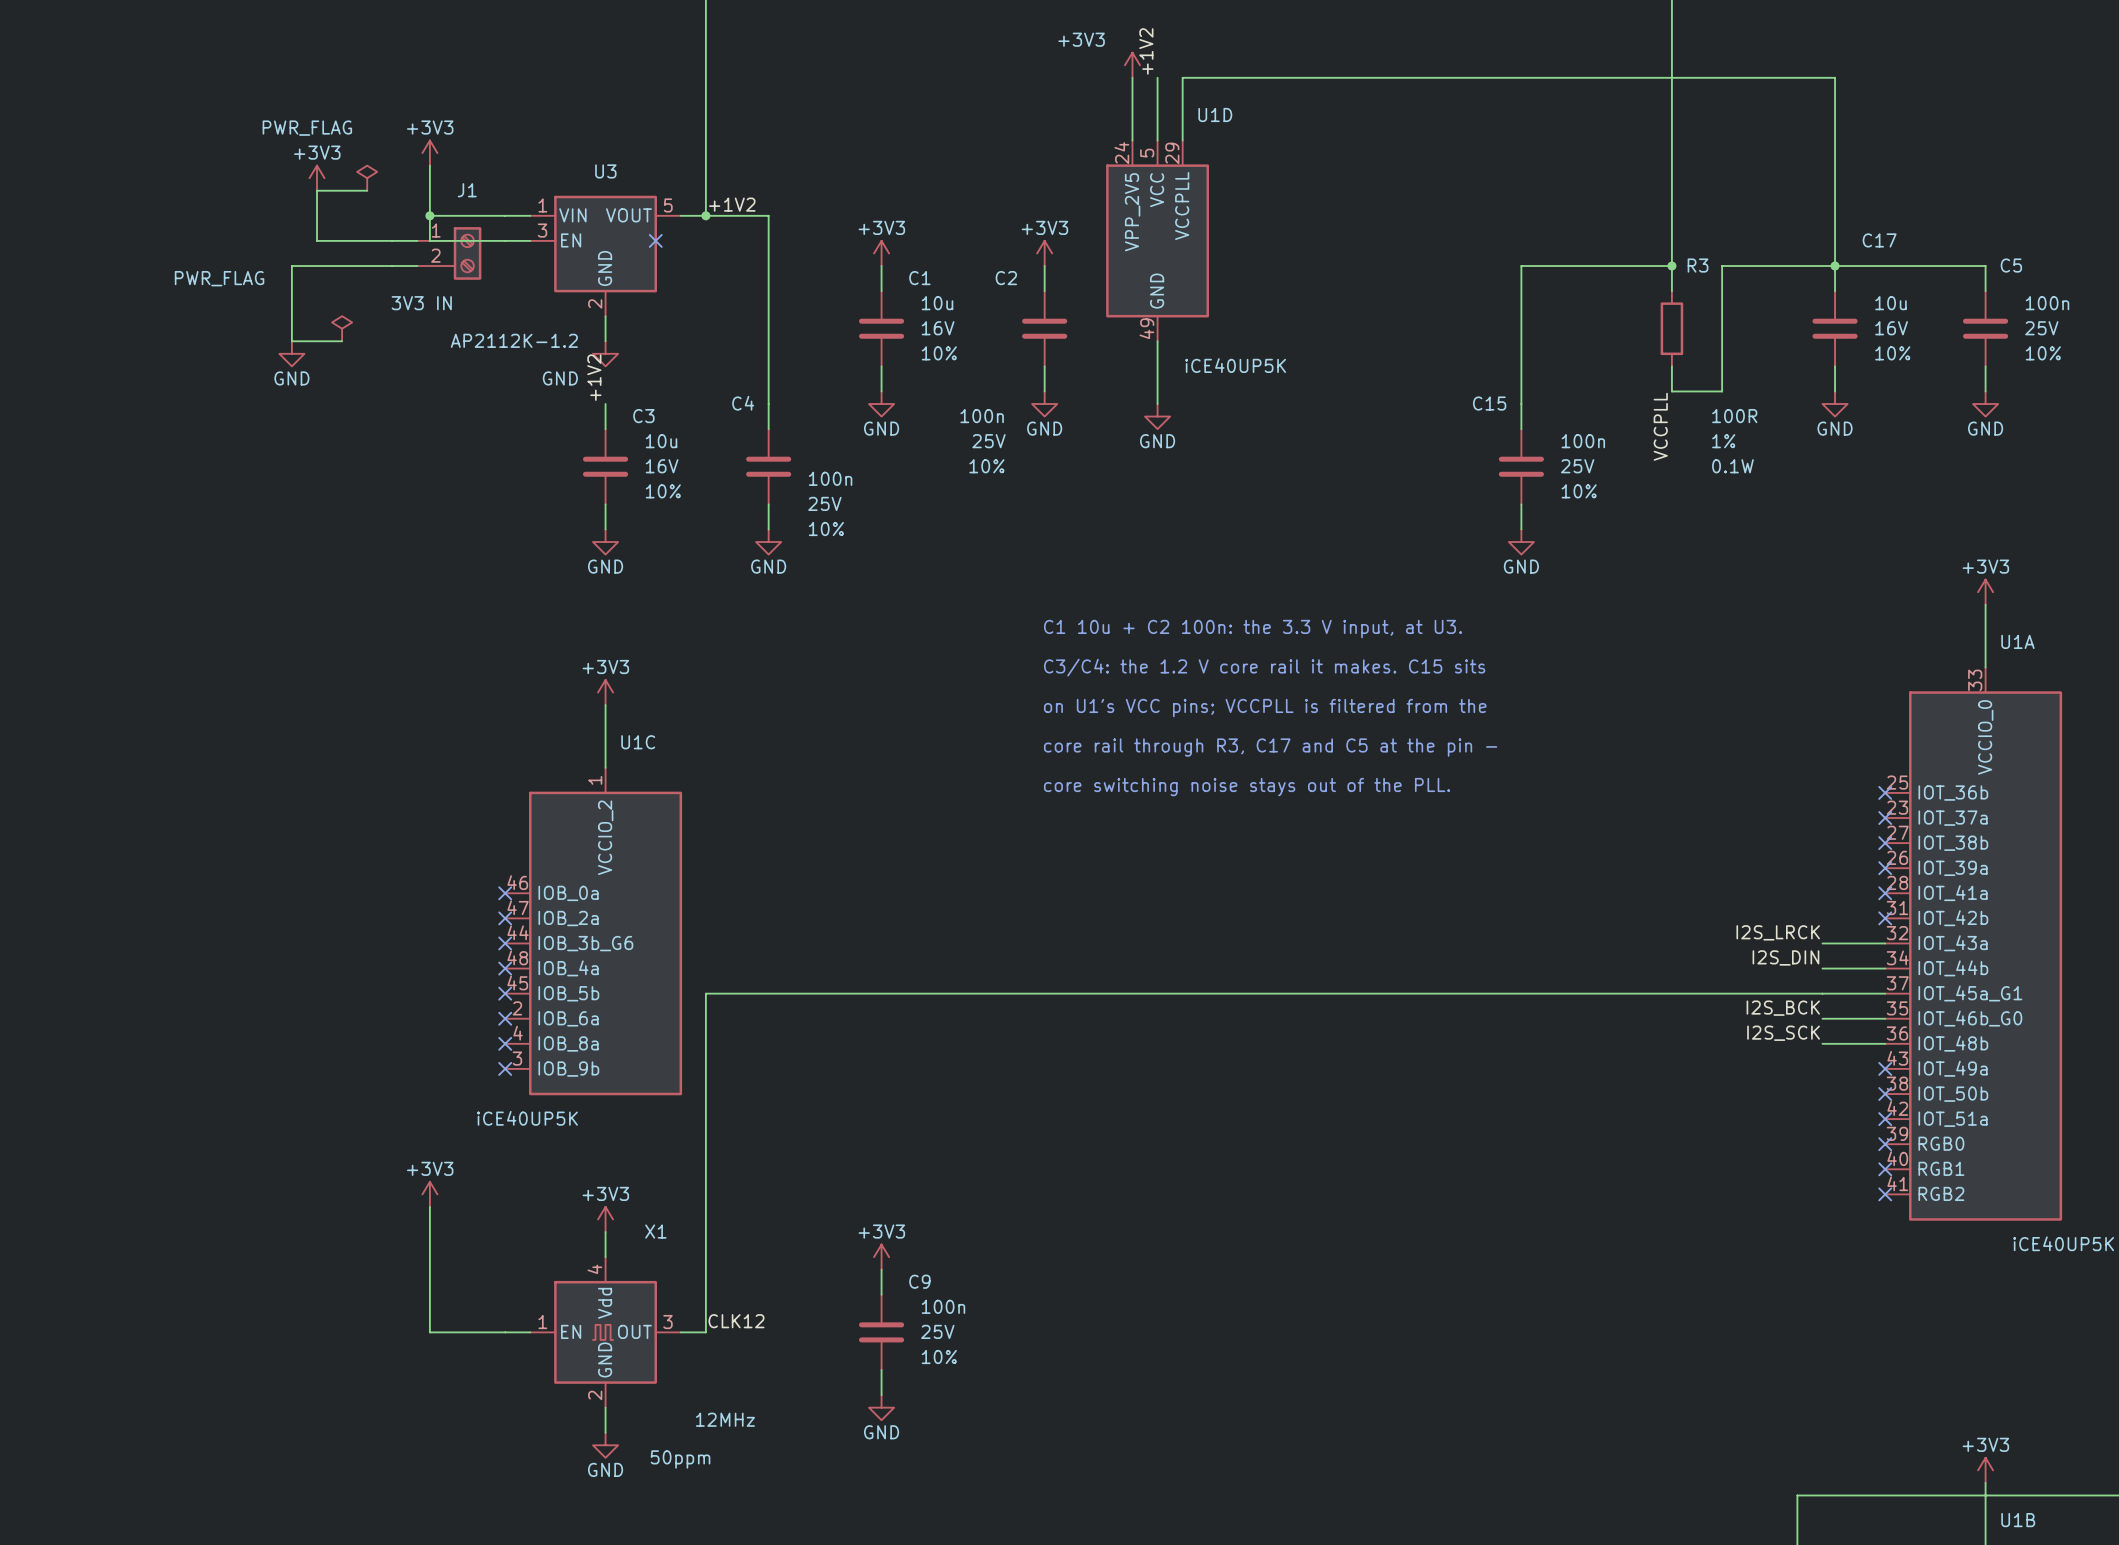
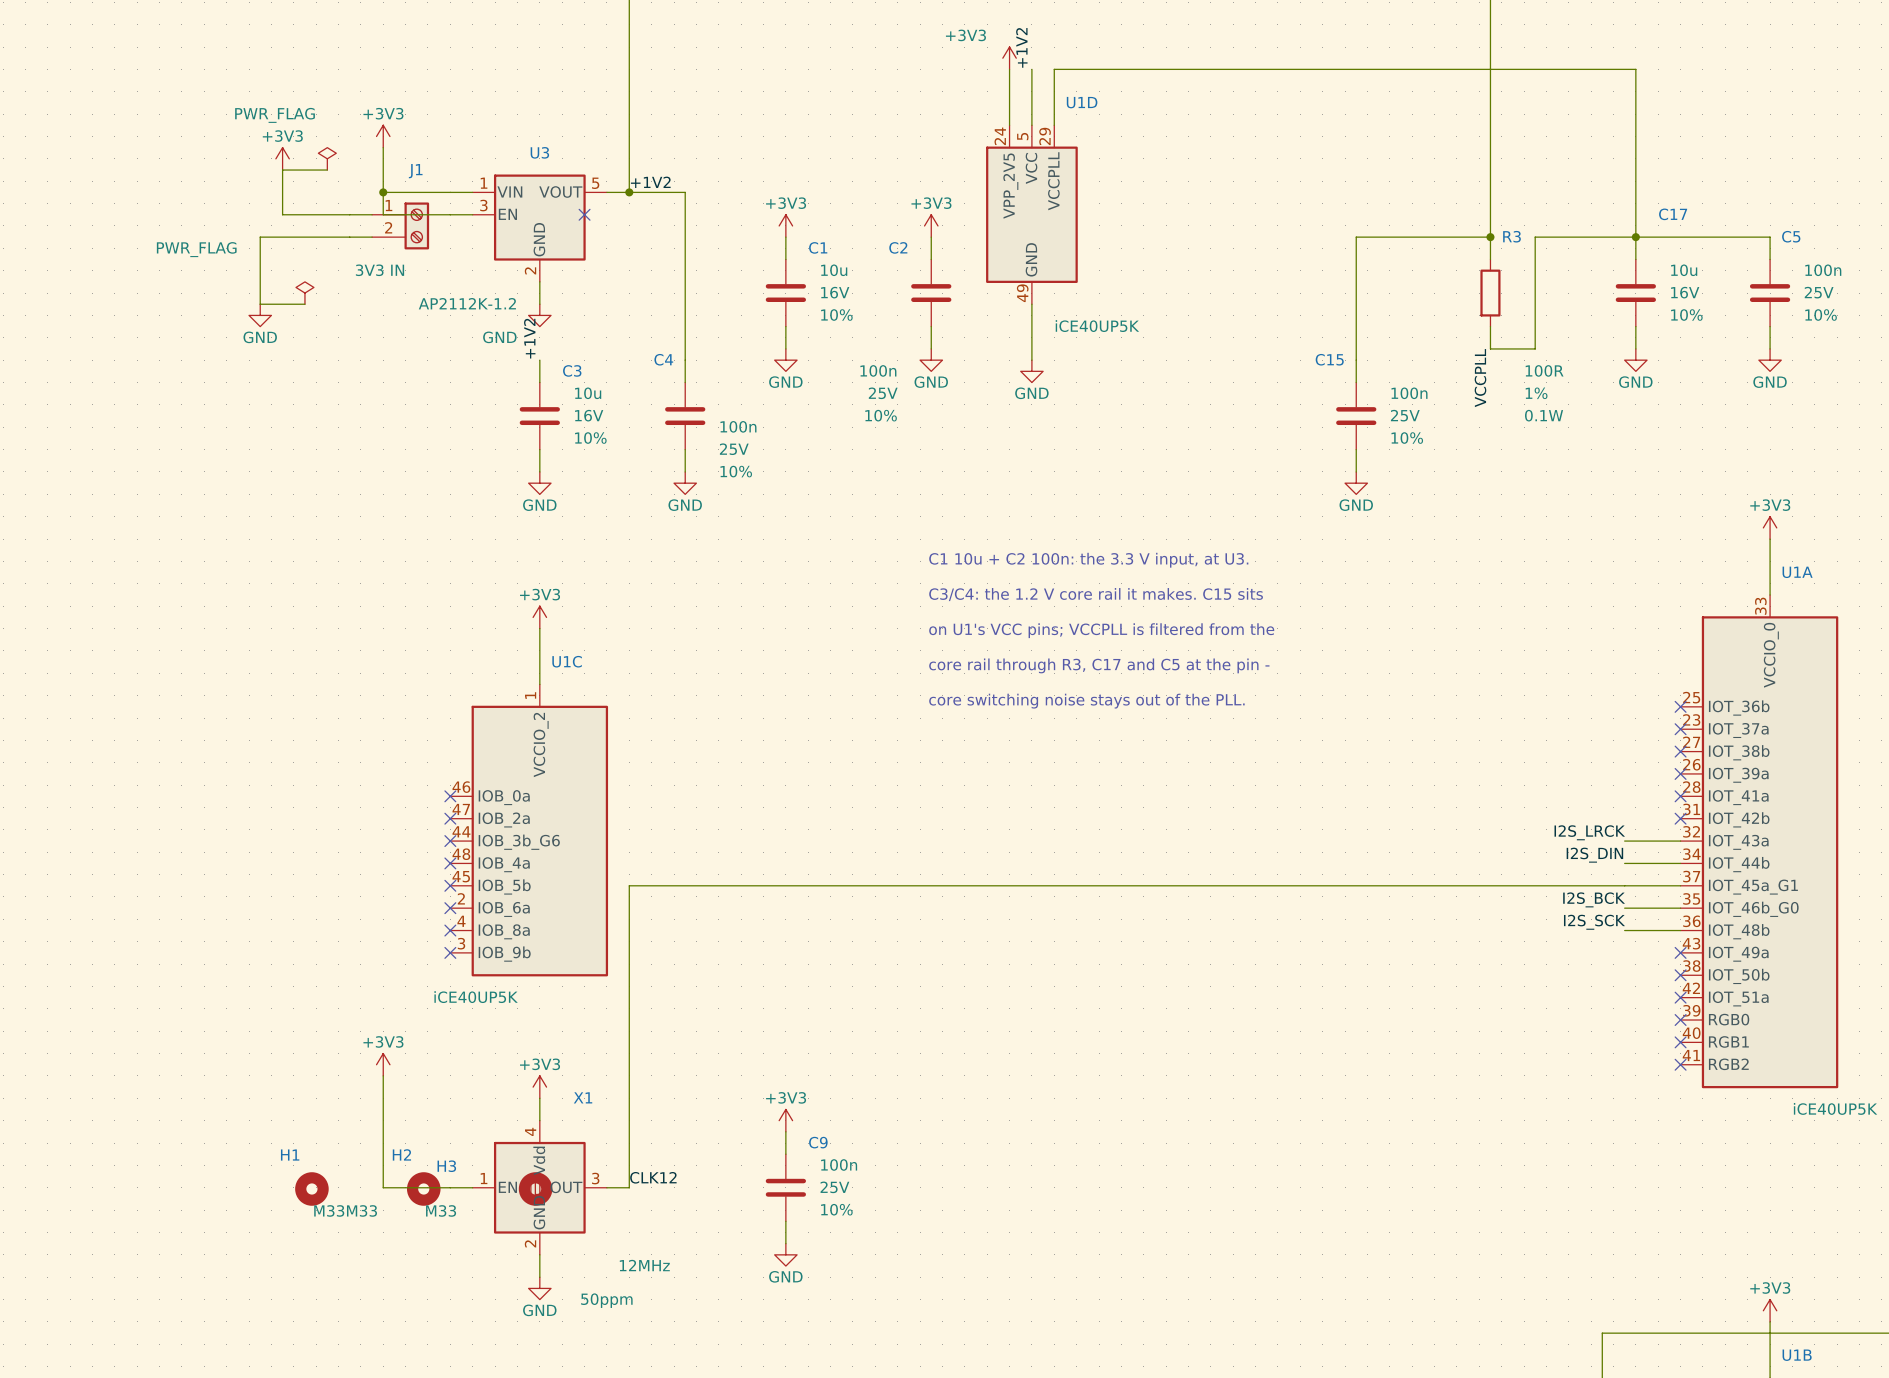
H1: none -> M33 (311, 1188)
H2: none -> M33 (423, 1188)
H3: none -> M33 (535, 1188)

